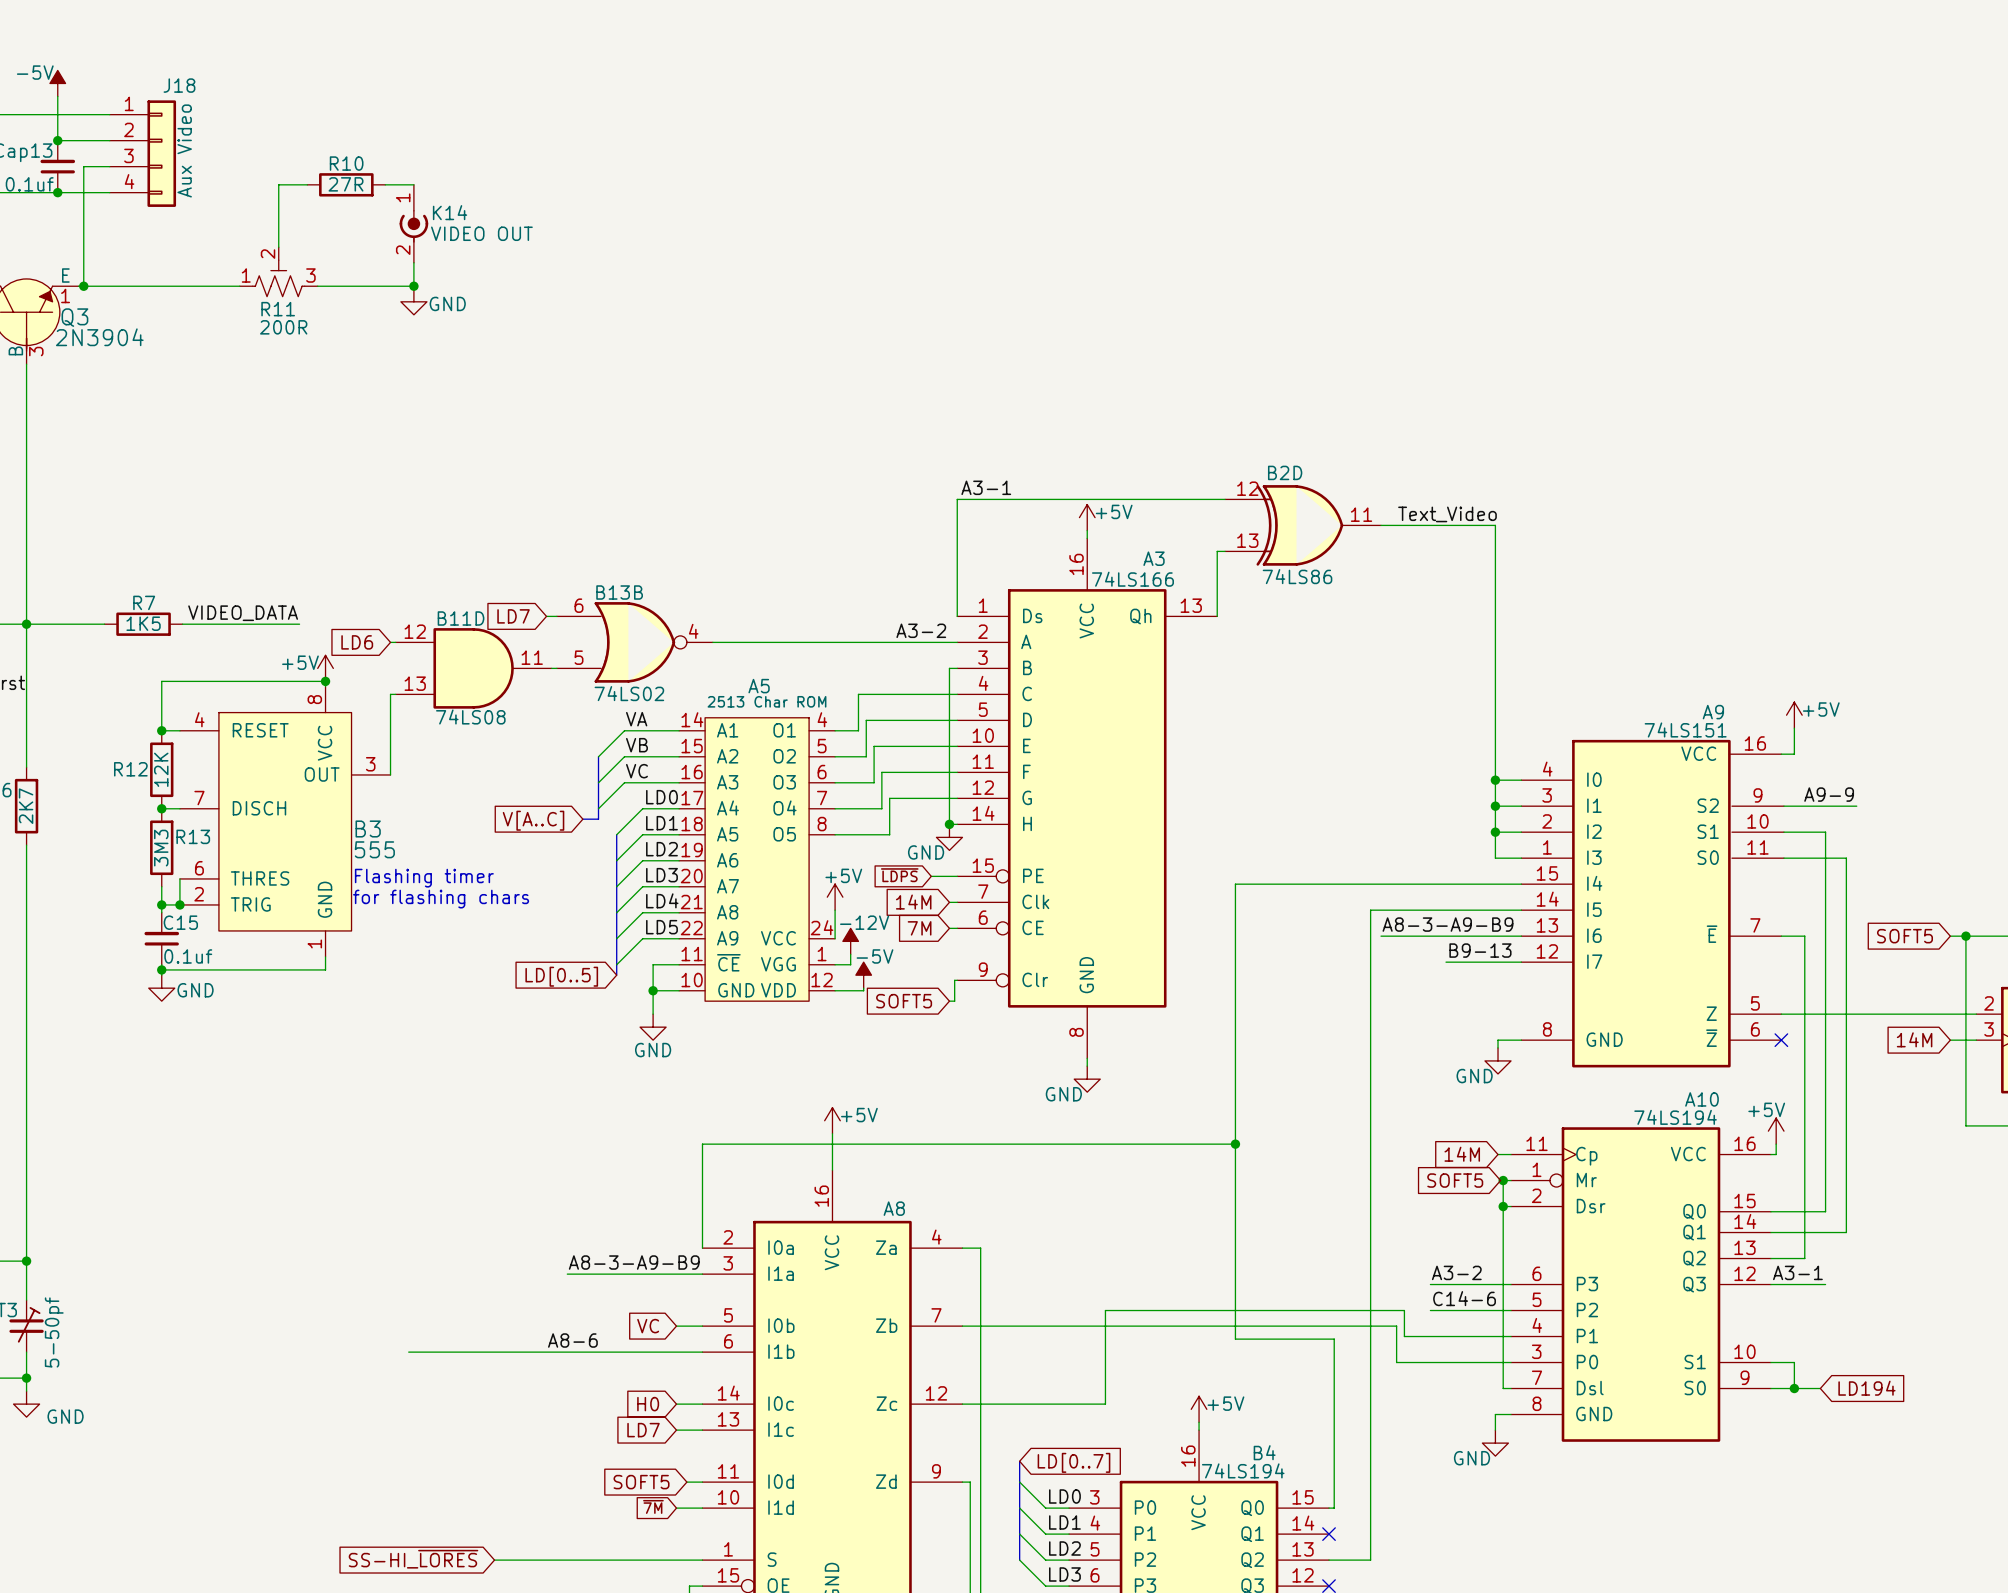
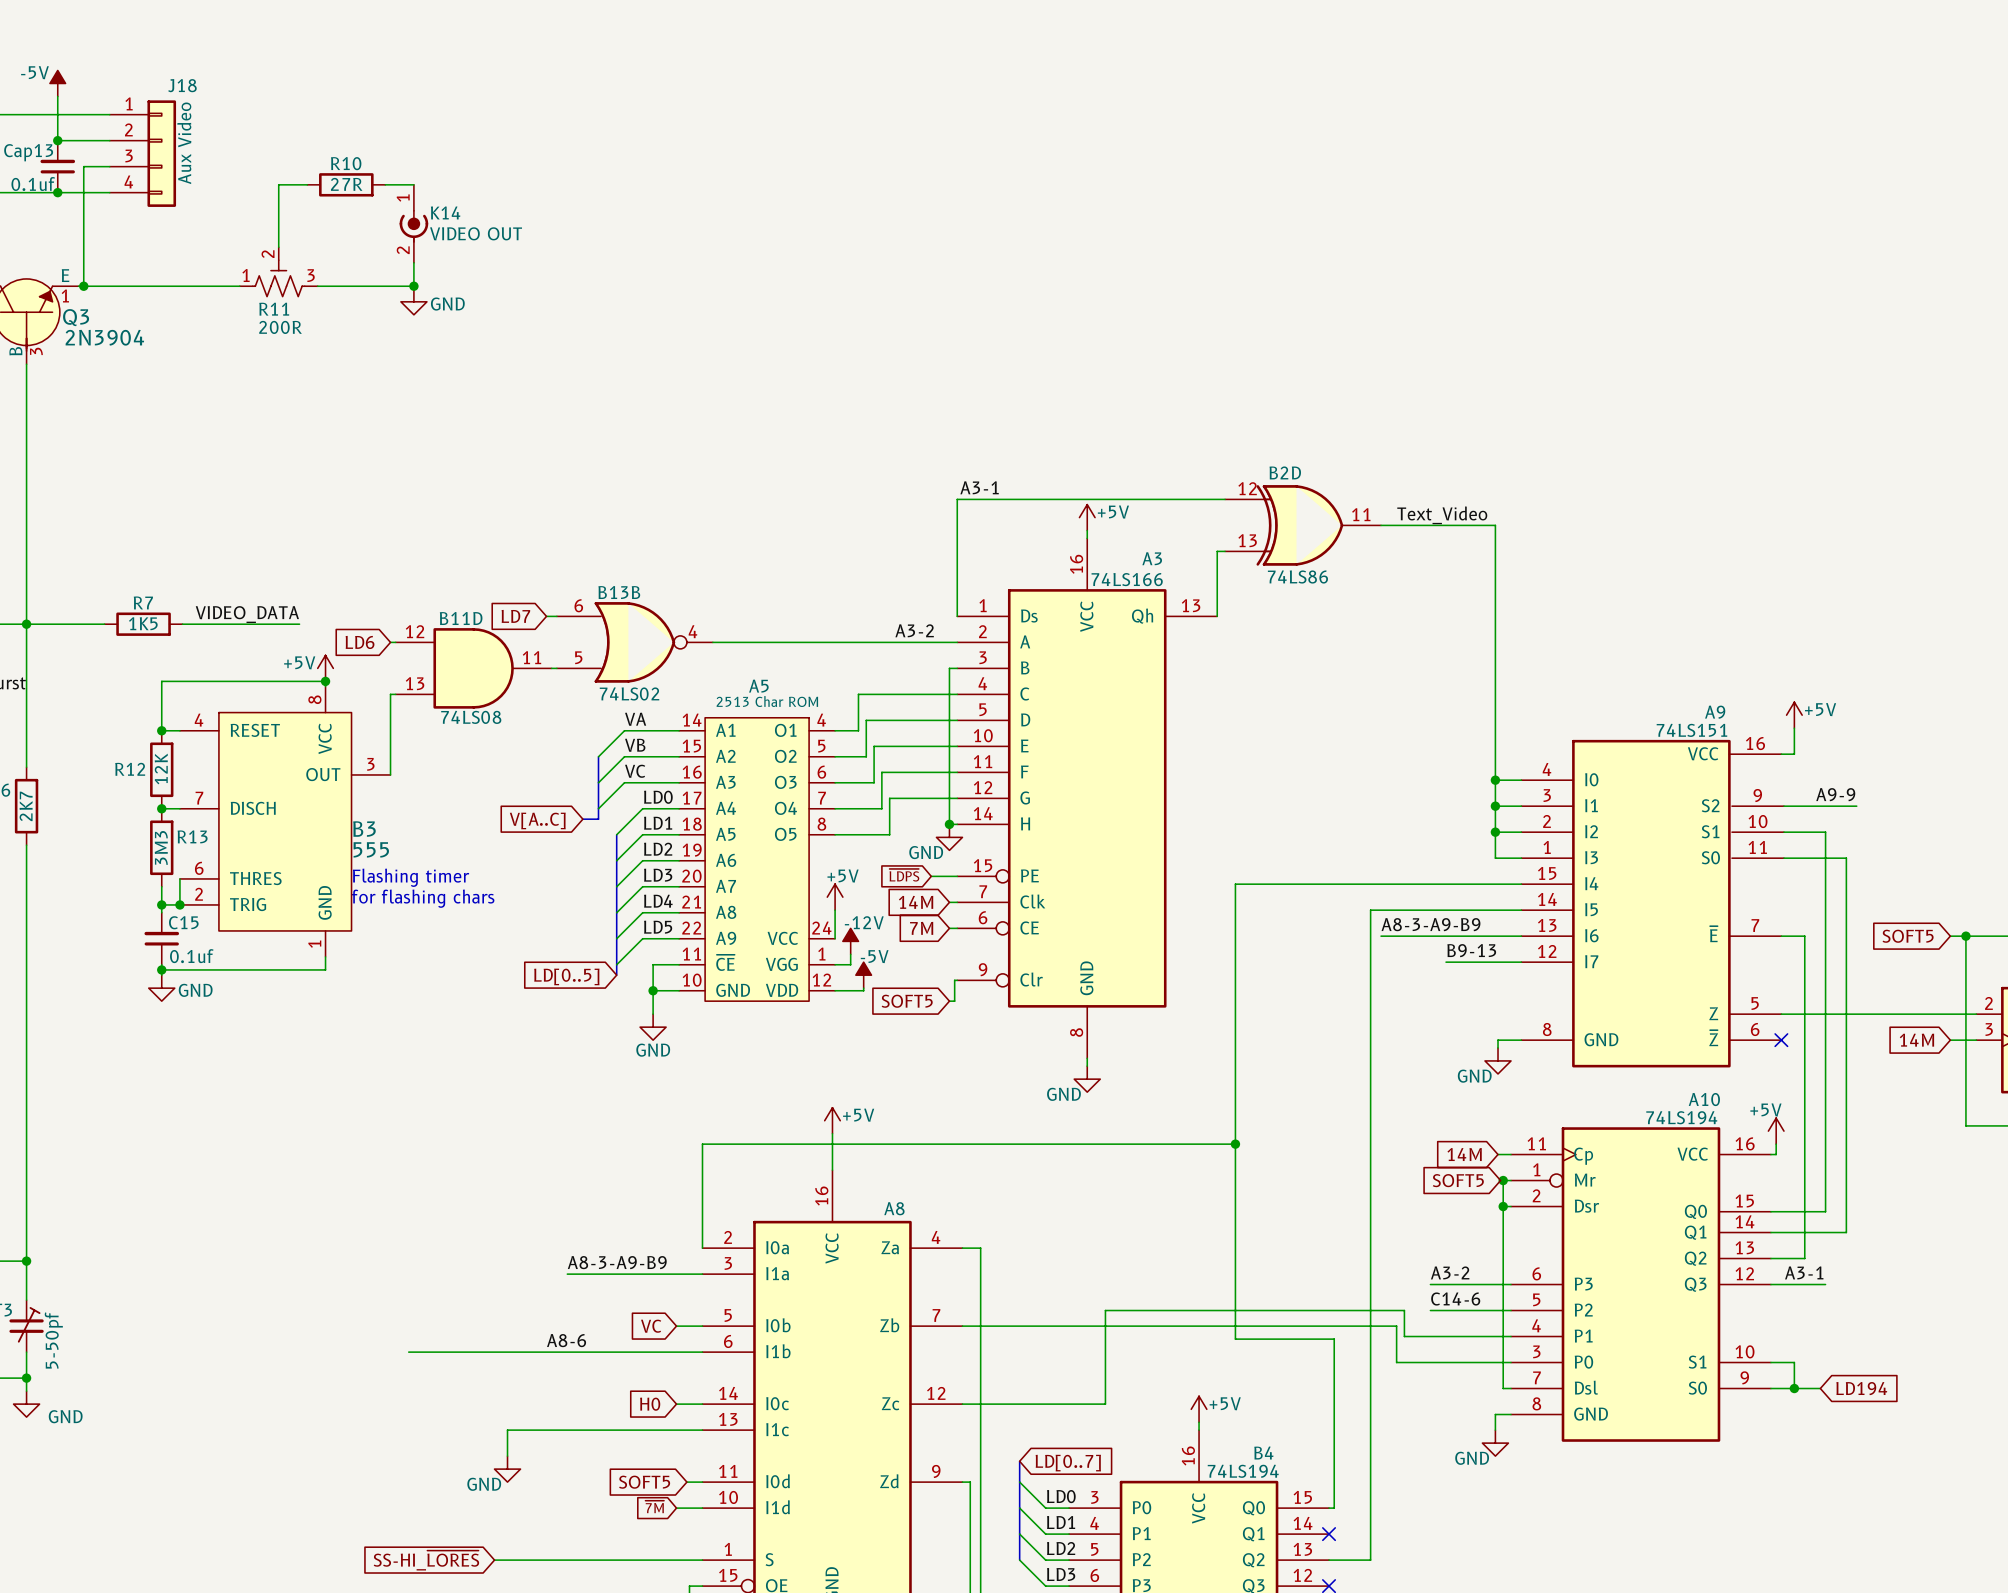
global label: LD7 (643, 1430) -> none
wire: none -> (676, 1430) (507, 1430) (507, 1456)
power symbol: none -> GND (507, 1469)

